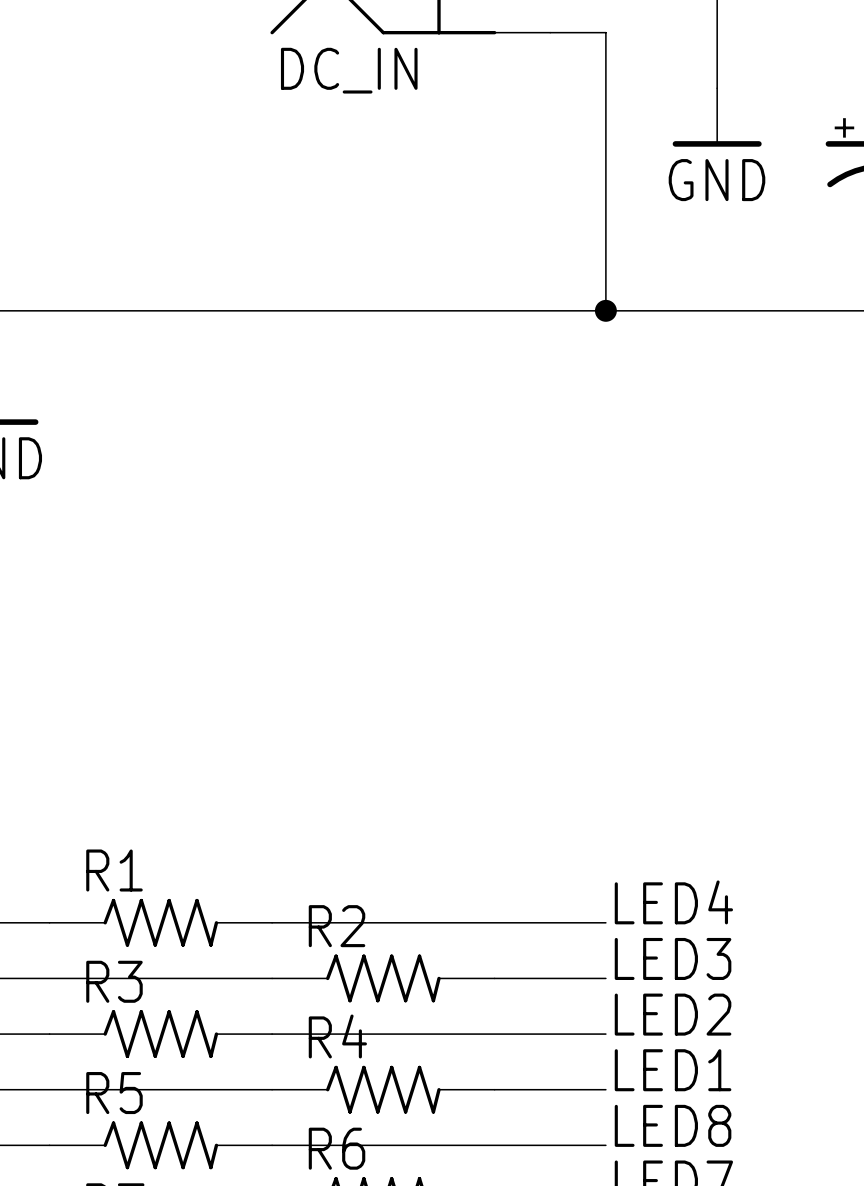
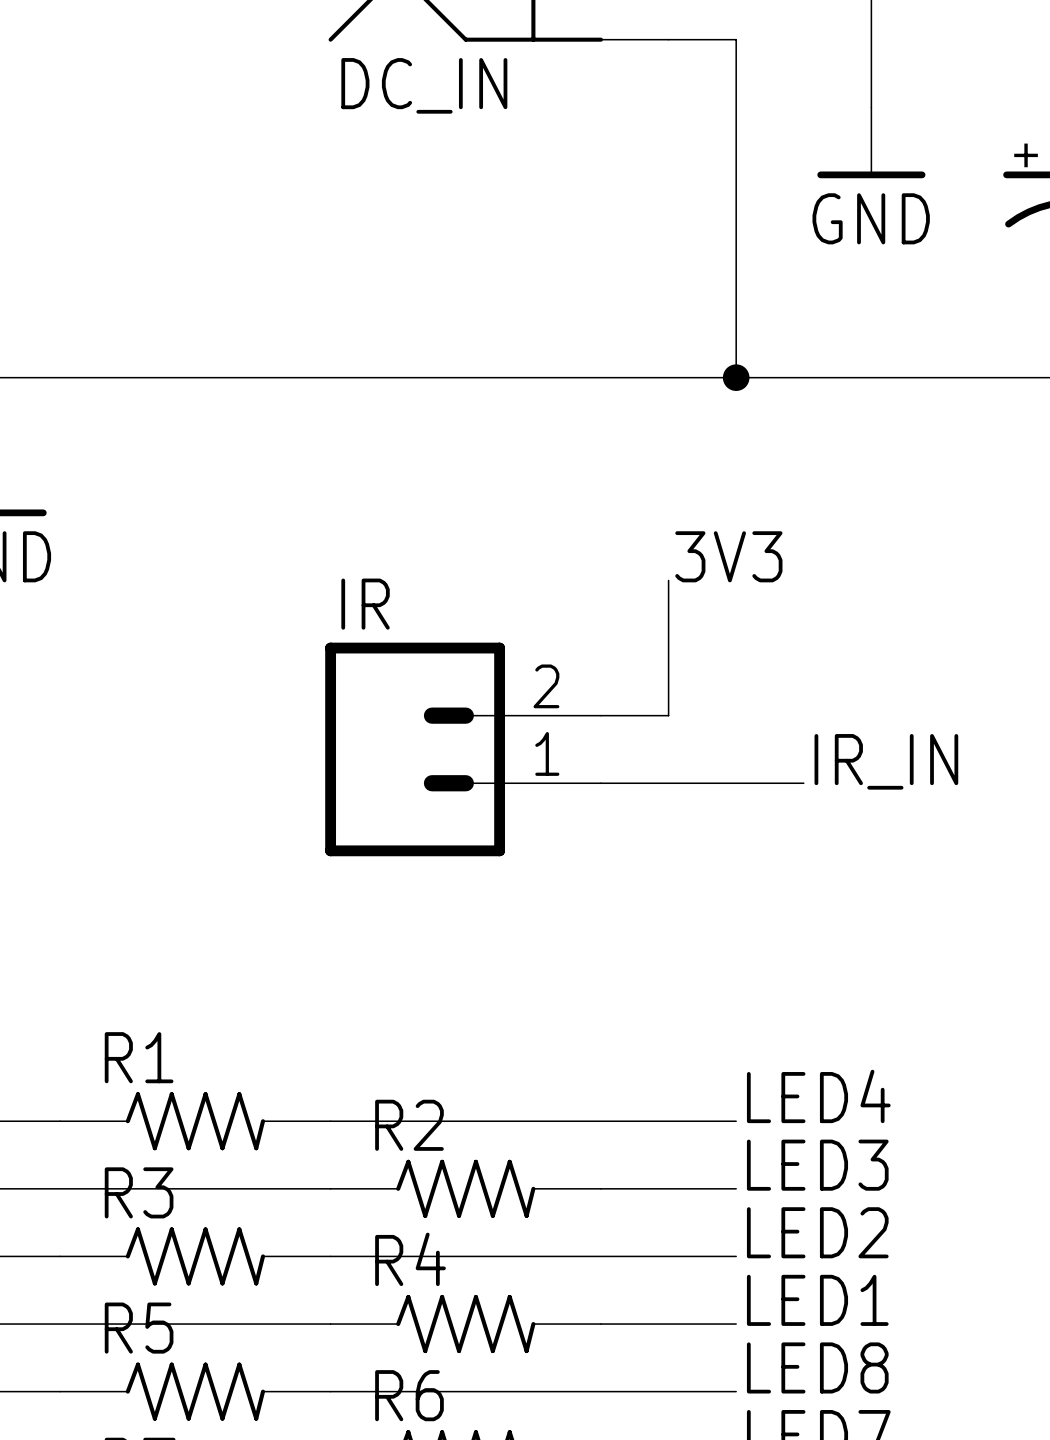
label: none -> 3V3 (728, 556)
wire: none -> (668, 580) (668, 715) (600, 715)
IR: none -> (463, 749)
label: none -> IR_IN (886, 761)
wire: none -> (600, 783) (803, 783)

